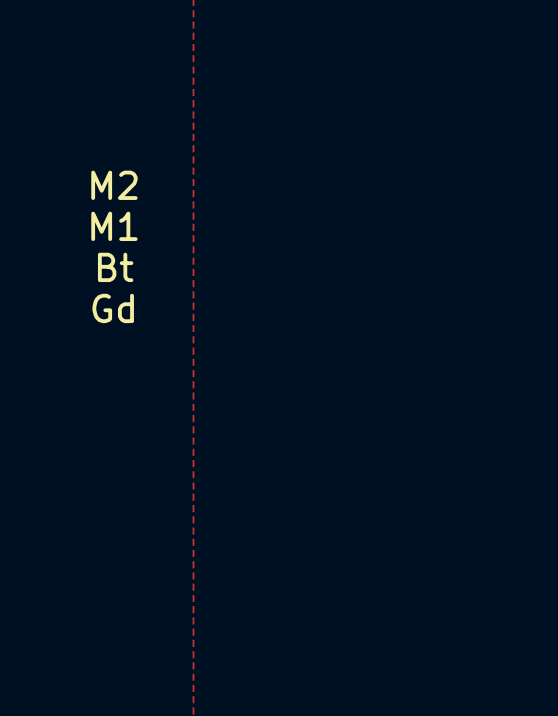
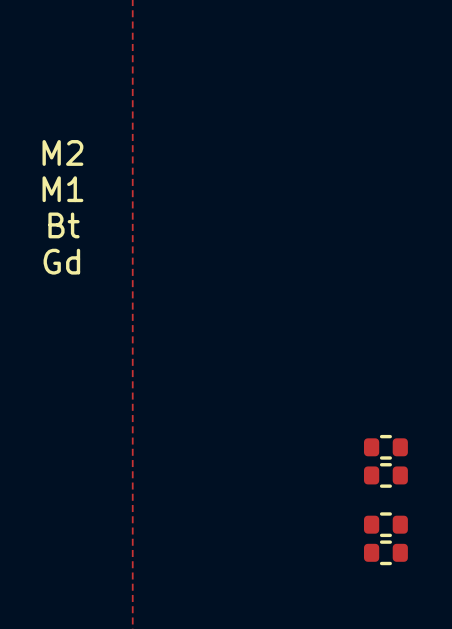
part: none -> (385, 447)
part: none -> (385, 475)
part: none -> (385, 524)
part: none -> (385, 552)

